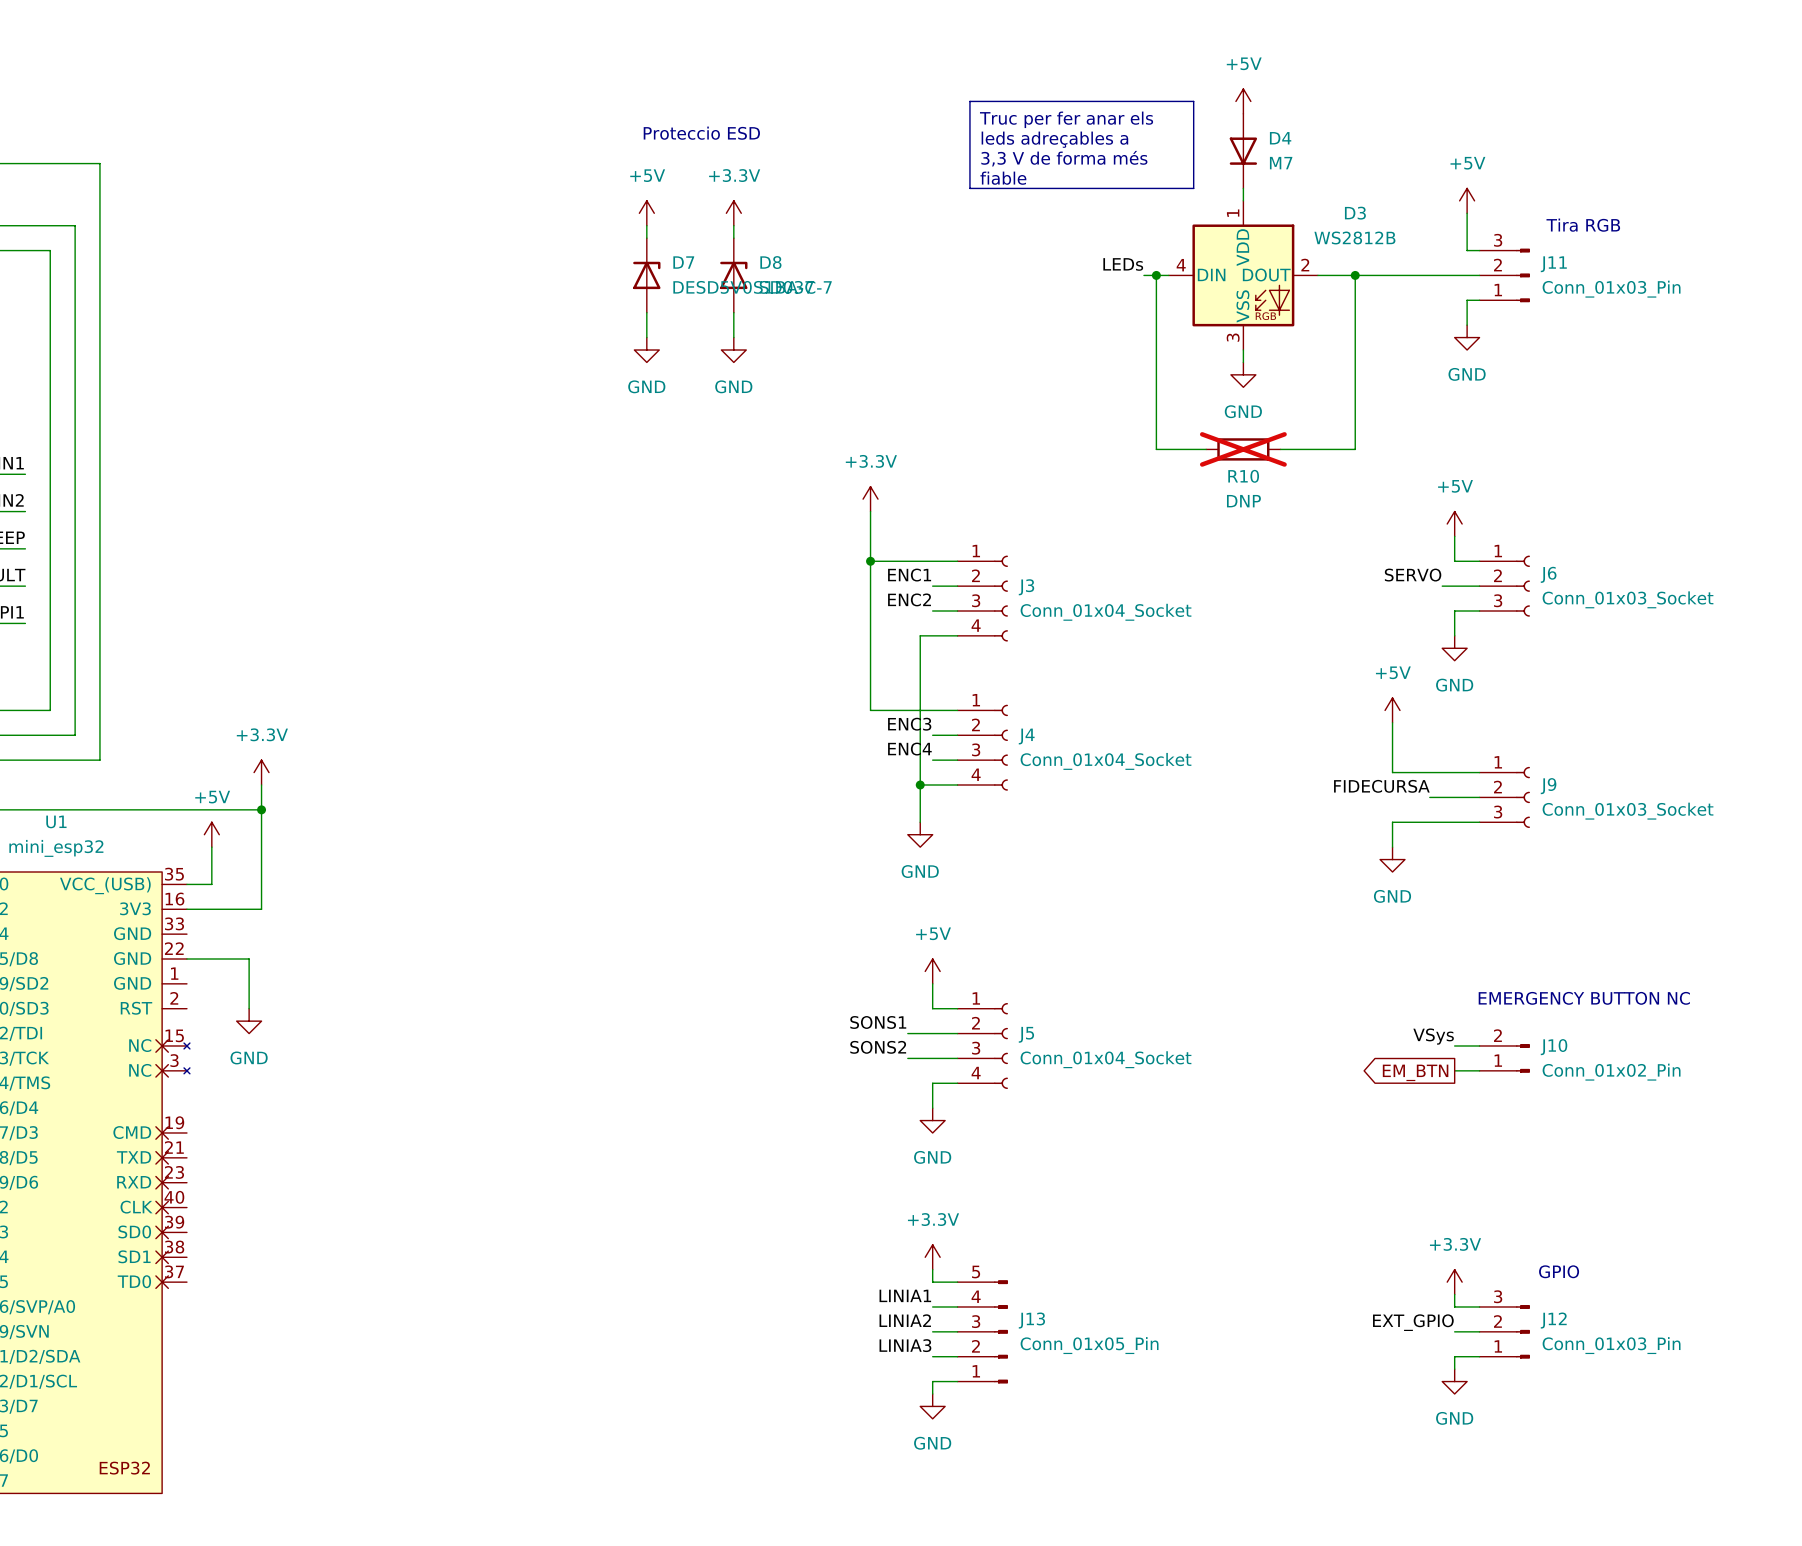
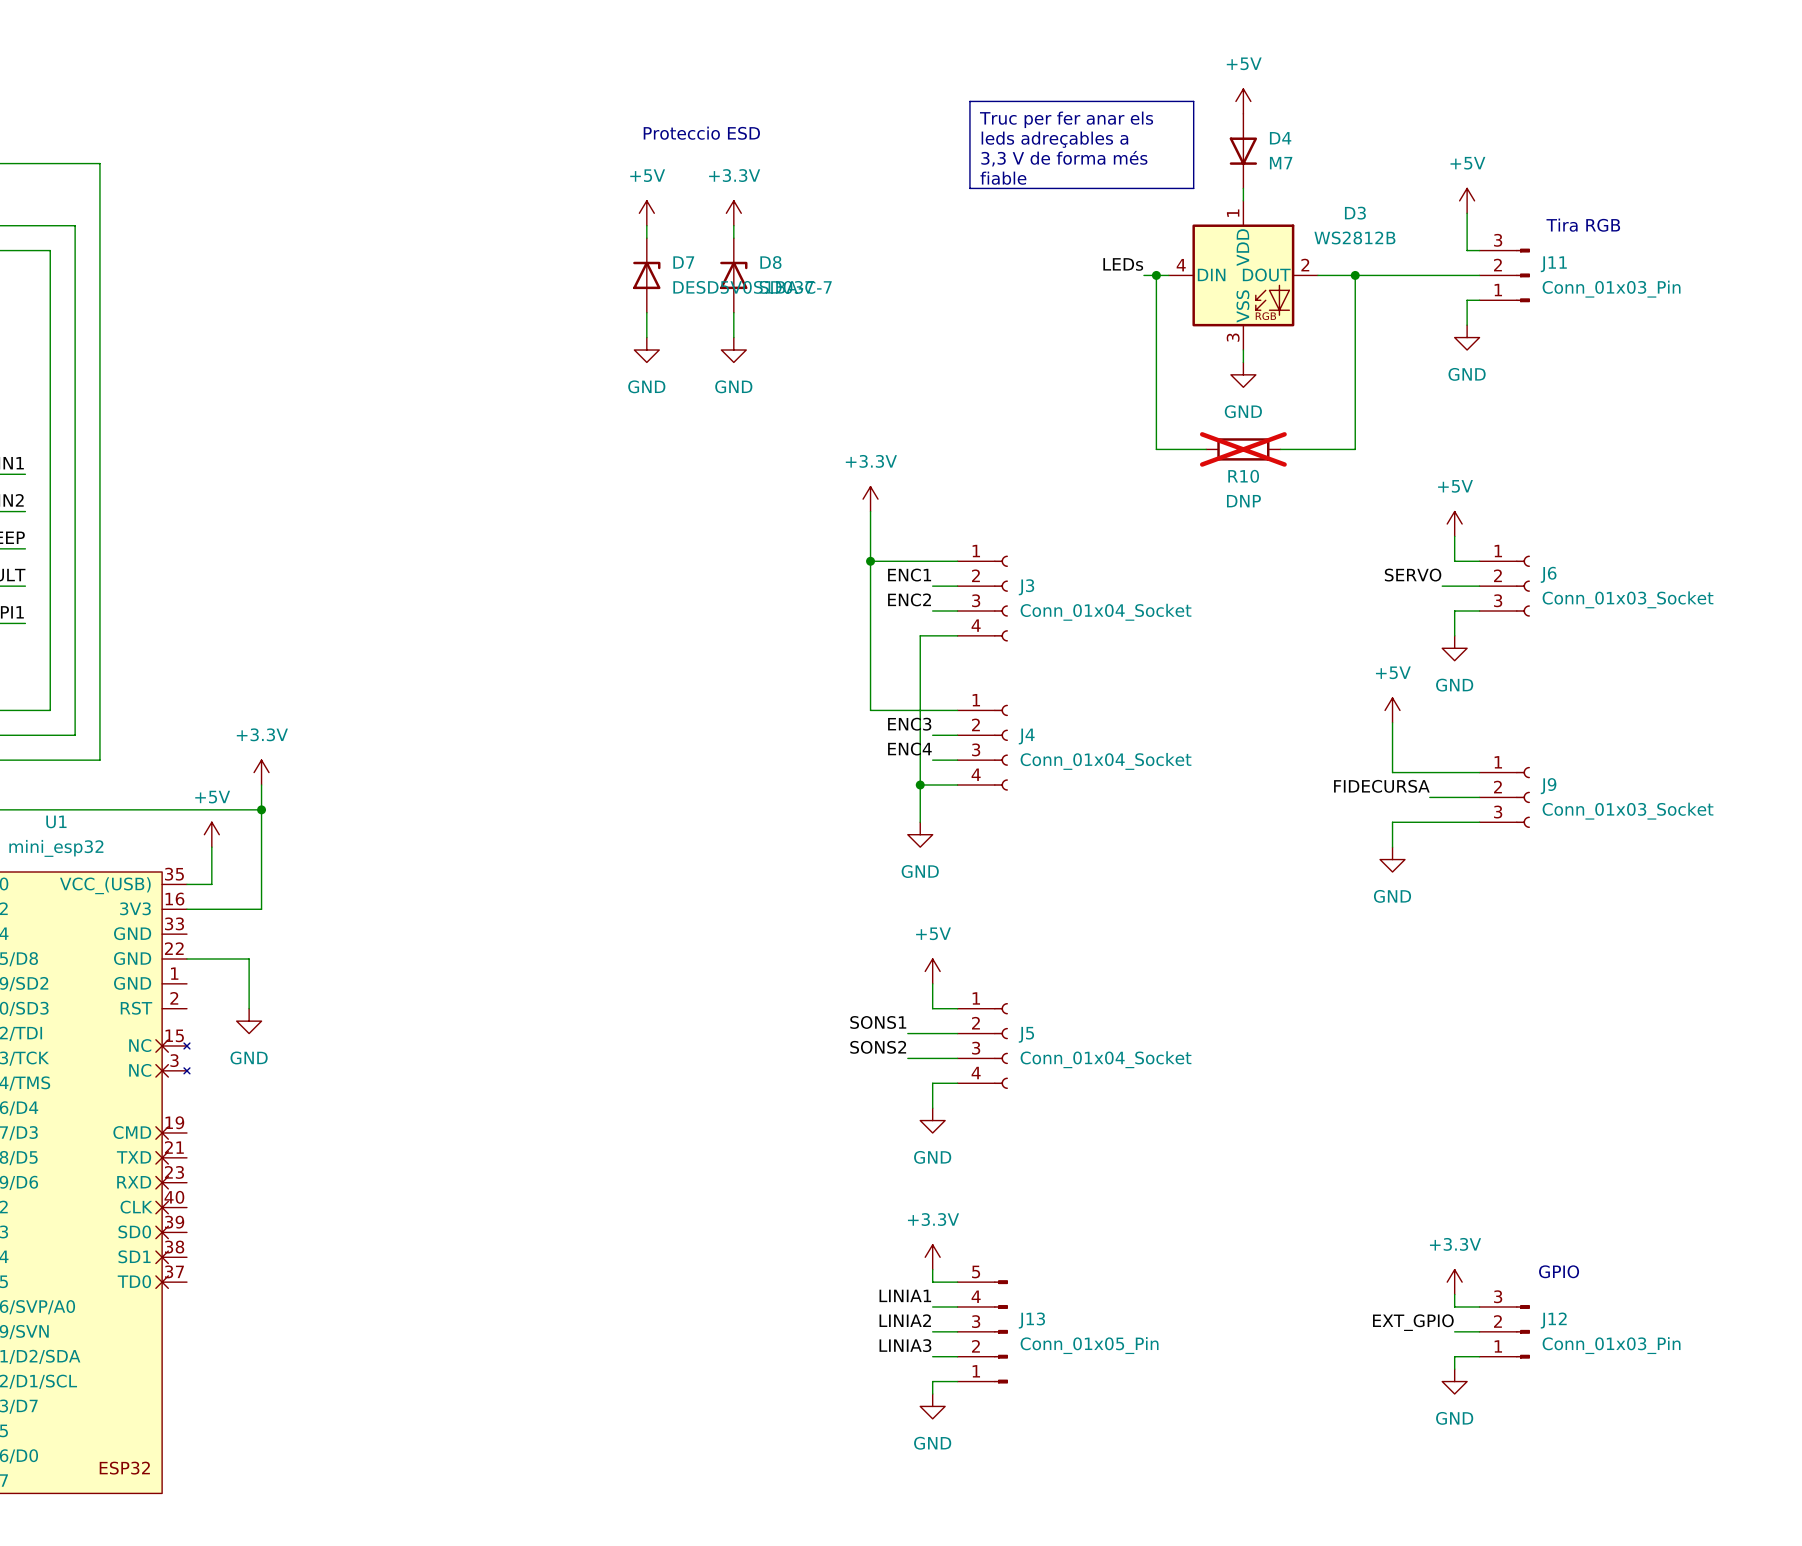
text: EMERGENCY BUTTON NC (1584, 998) -> none
label: VSys (1433, 1036) -> none
wire: (1454, 1045) (1479, 1045) -> none
J10: Conn_01x02_Pin (1504, 1058) -> none
wire: (1454, 1070) (1479, 1070) -> none
global label: EM_BTN (1415, 1072) -> none

